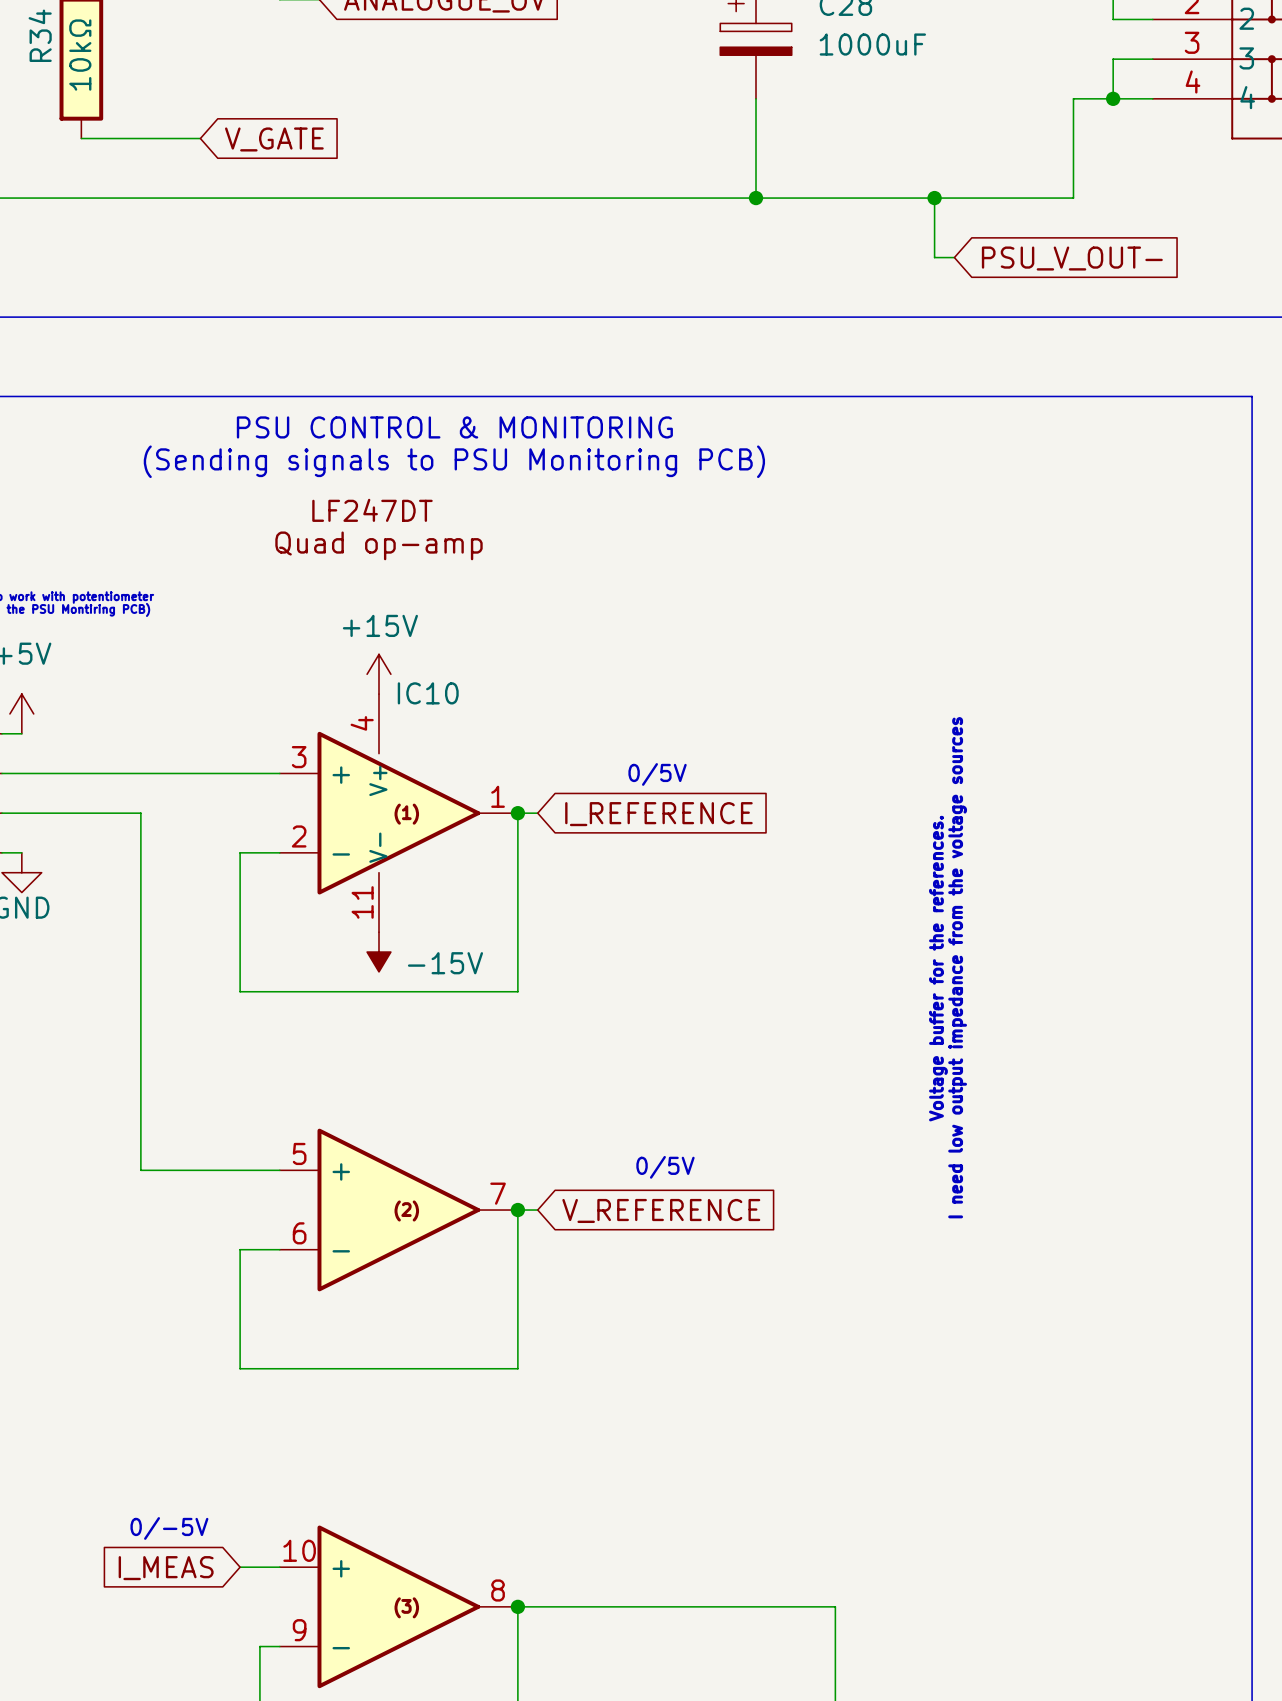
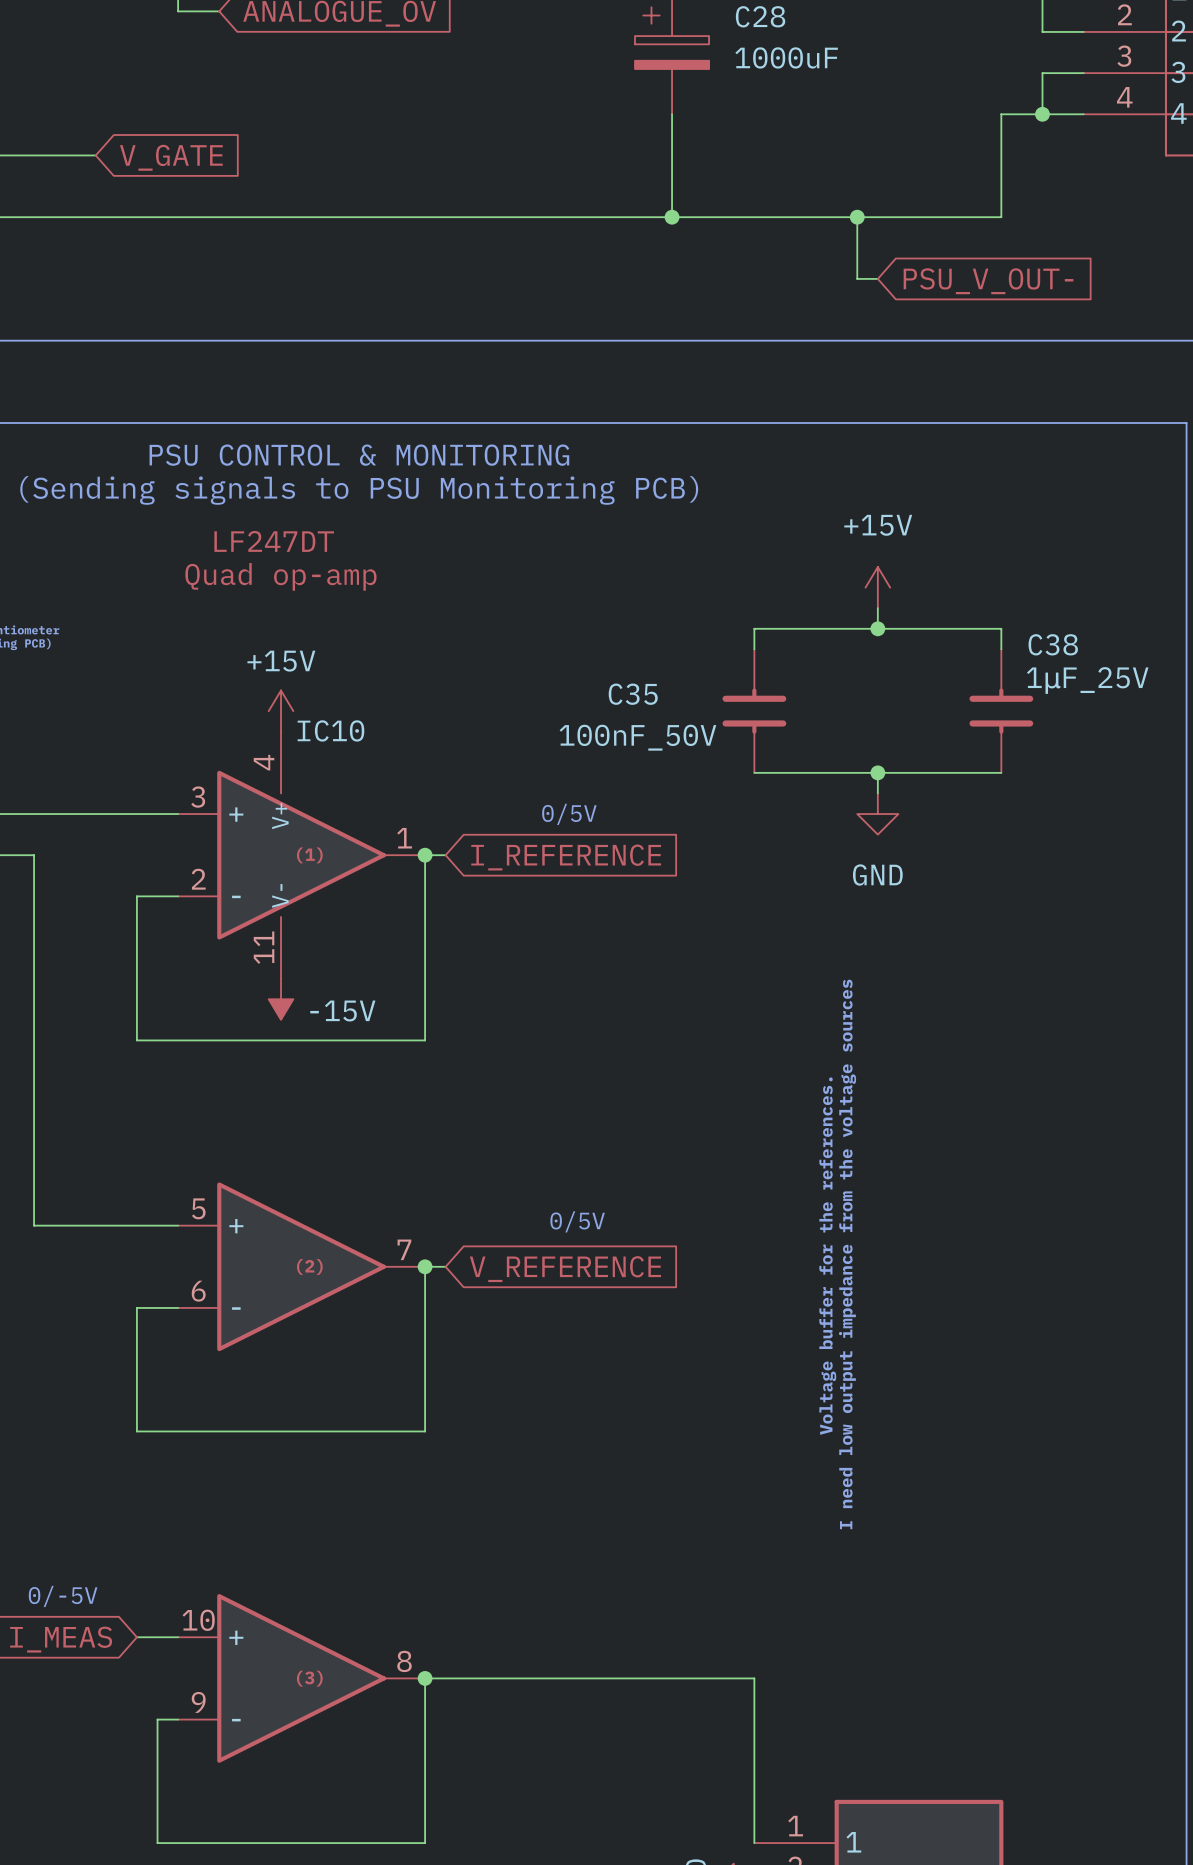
power symbol: none -> +15V (877, 587)
wire: none -> (877, 608) (877, 628)
junction: none -> (877, 628)
wire: none -> (754, 649) (754, 628) (1001, 628) (1001, 649)
C35: none -> 100nF_50V (754, 711)
C38: none -> 1μF_25V (1001, 711)
wire: none -> (754, 772) (1001, 772)
junction: none -> (877, 772)
power symbol: none -> GND (877, 814)
text position: I need low output impedance from the voltage sources (957, 967) -> I need low output impedance from the voltage sources (847, 1254)
text position: Voltage buffer for the references. (938, 968) -> Voltage buffer for the references. (827, 1256)

